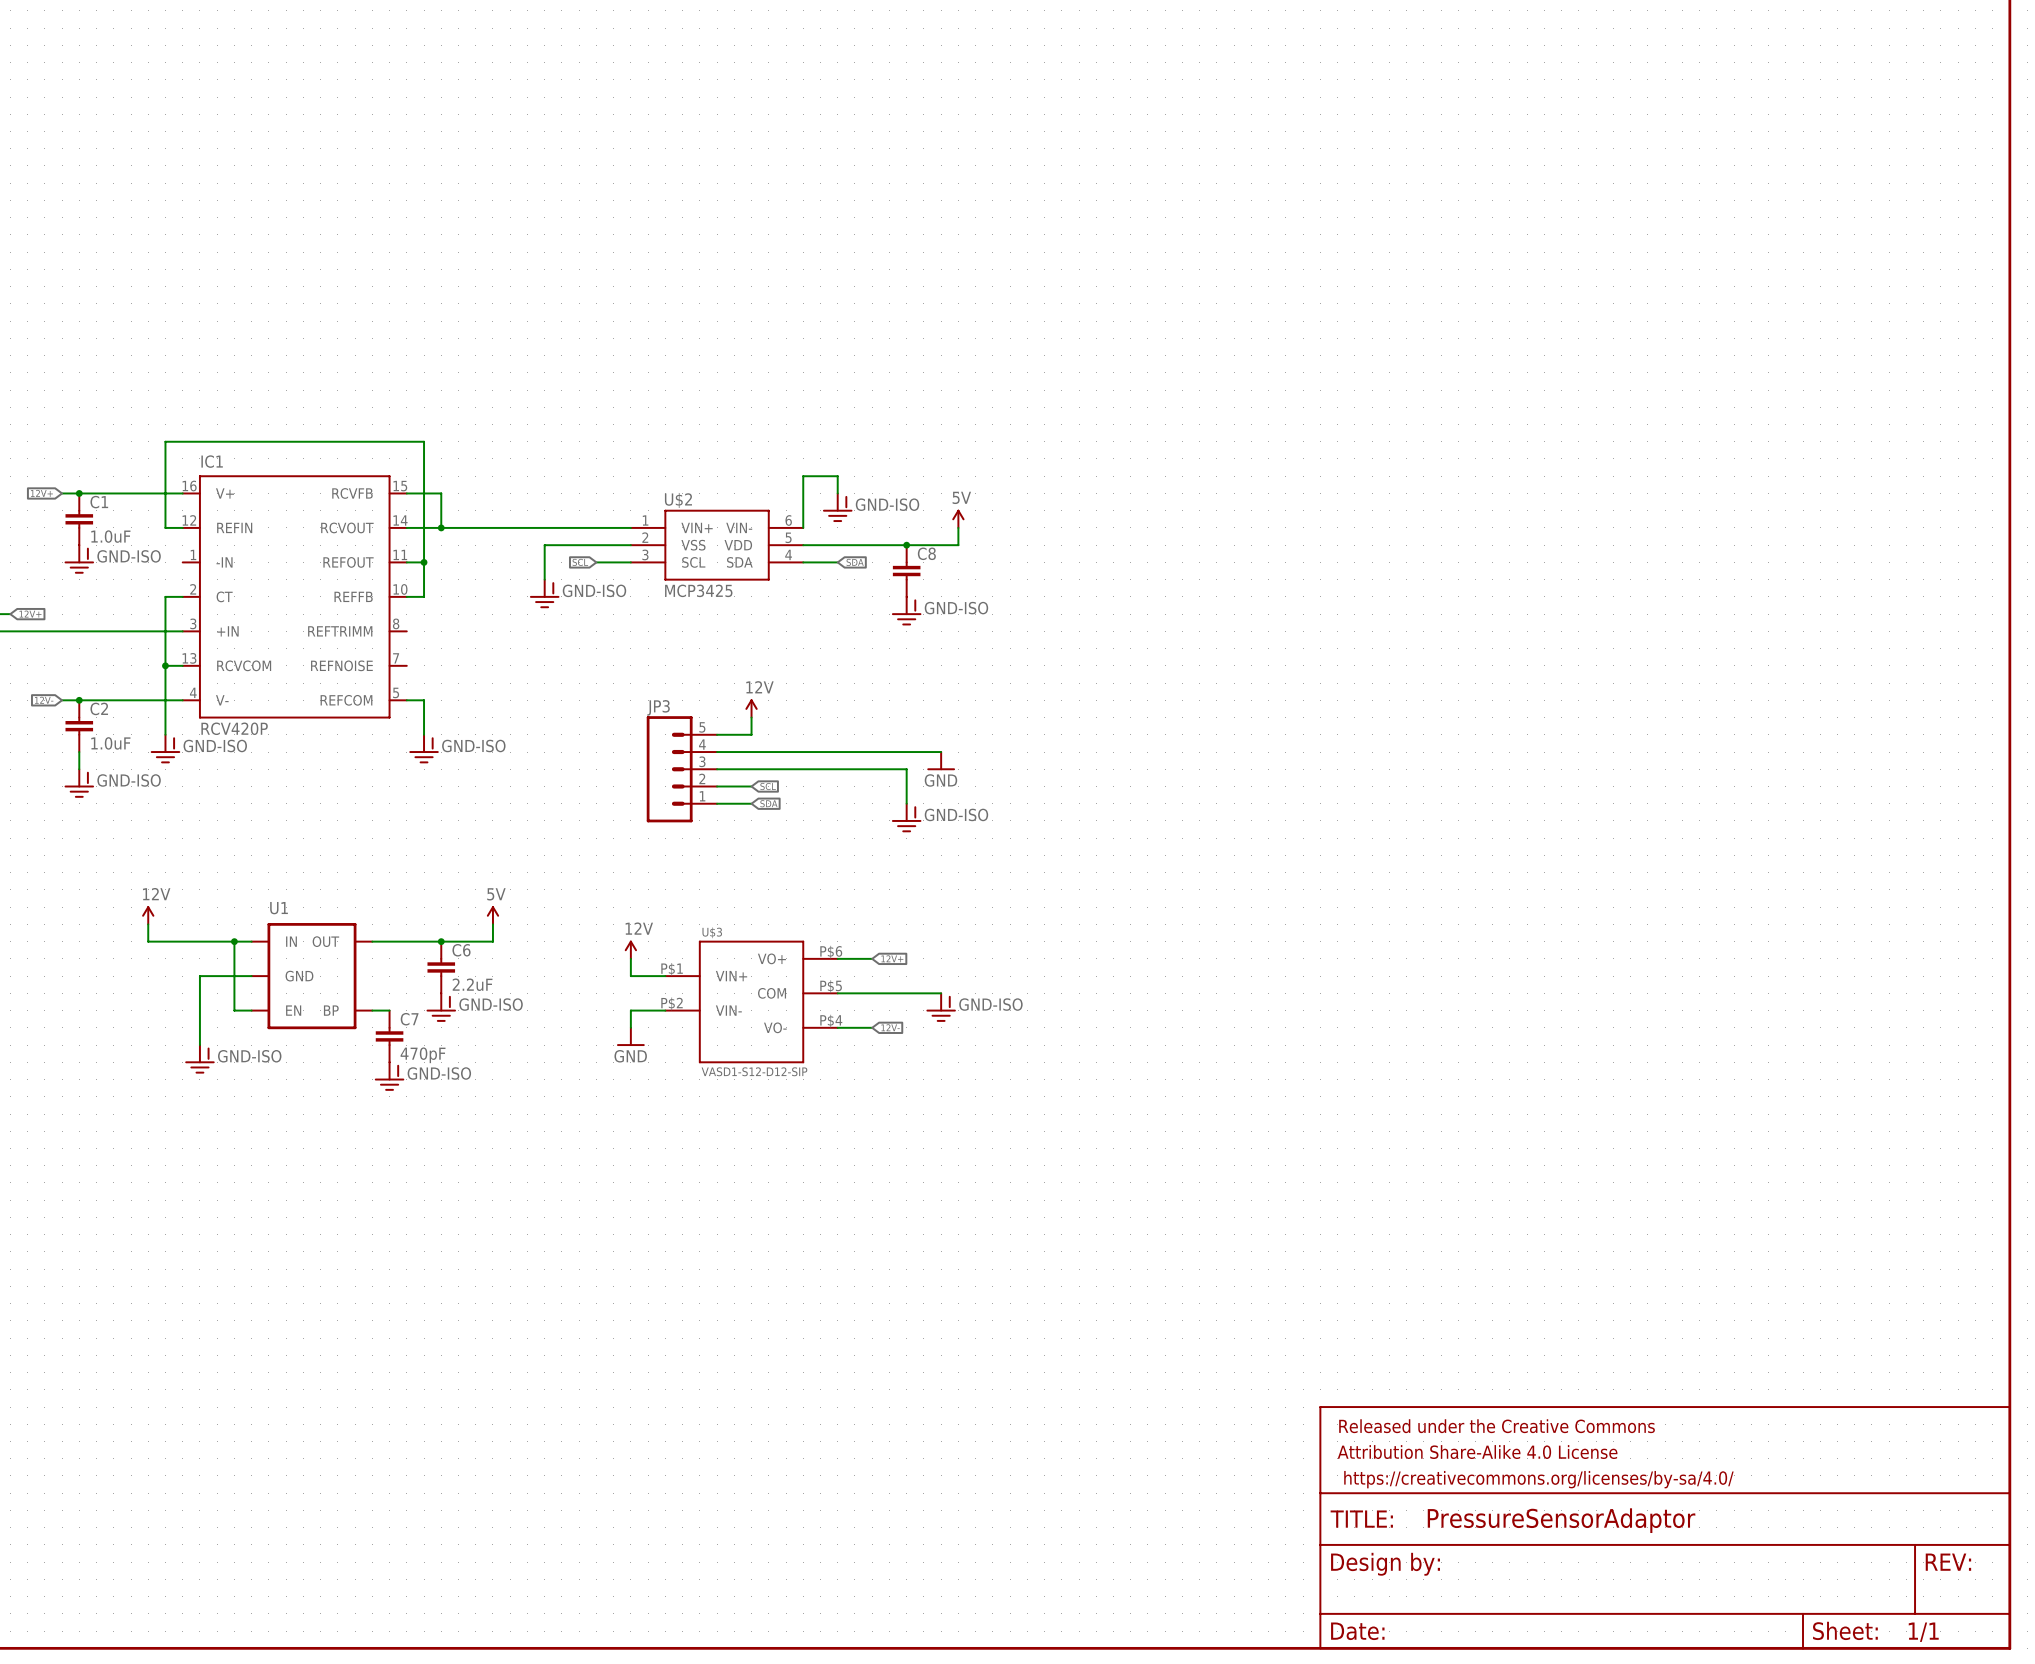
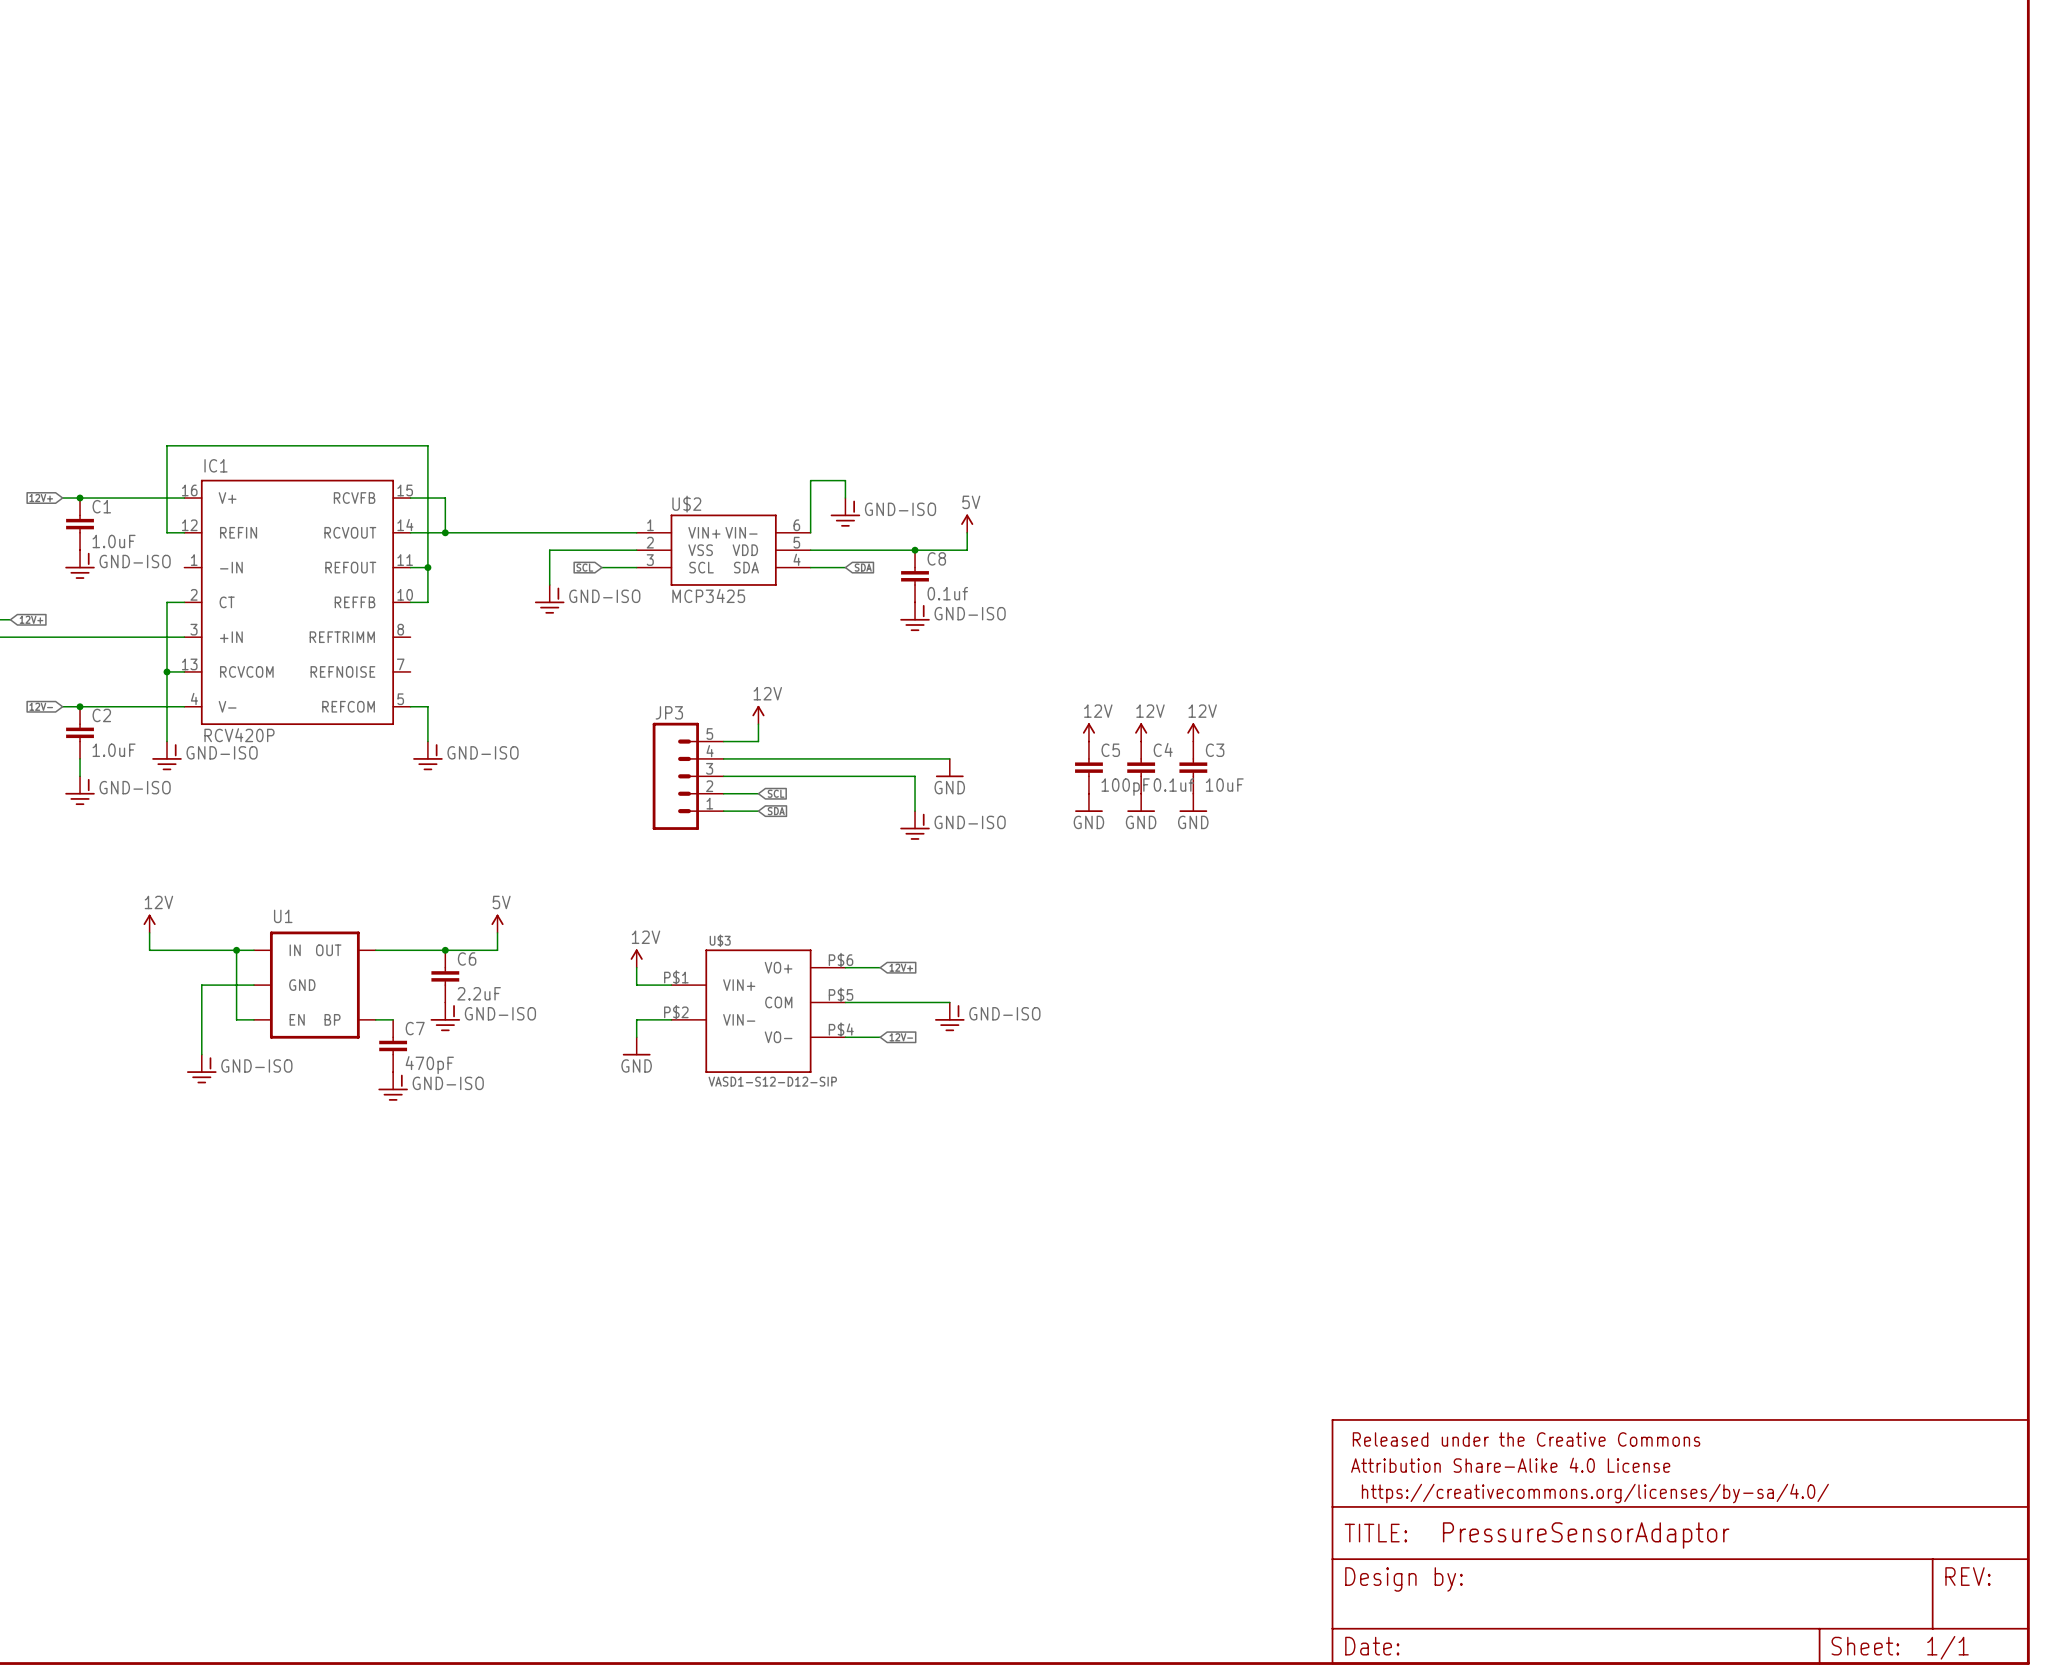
C8 value: none -> 0.1uf (947, 593)
power symbol: none -> 12V (1088, 732)
power symbol: none -> 12V (1141, 732)
power symbol: none -> 12V (1193, 732)
C5: none -> 100pF (1088, 767)
C4: none -> 0.1uf (1141, 767)
C3: none -> 10uF (1193, 767)
power symbol: none -> GND (1088, 802)
power symbol: none -> GND (1141, 802)
power symbol: none -> GND (1193, 802)

